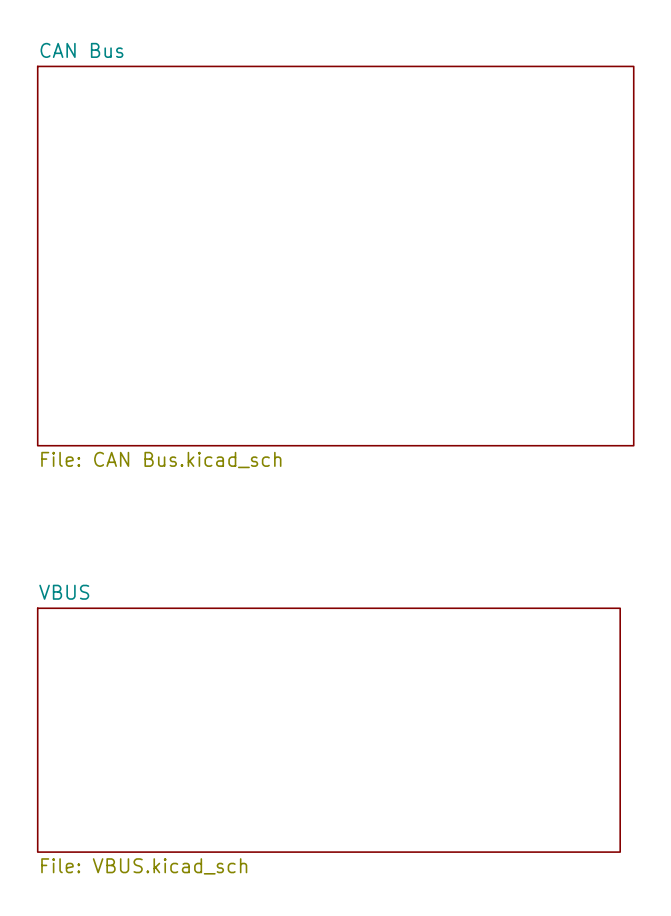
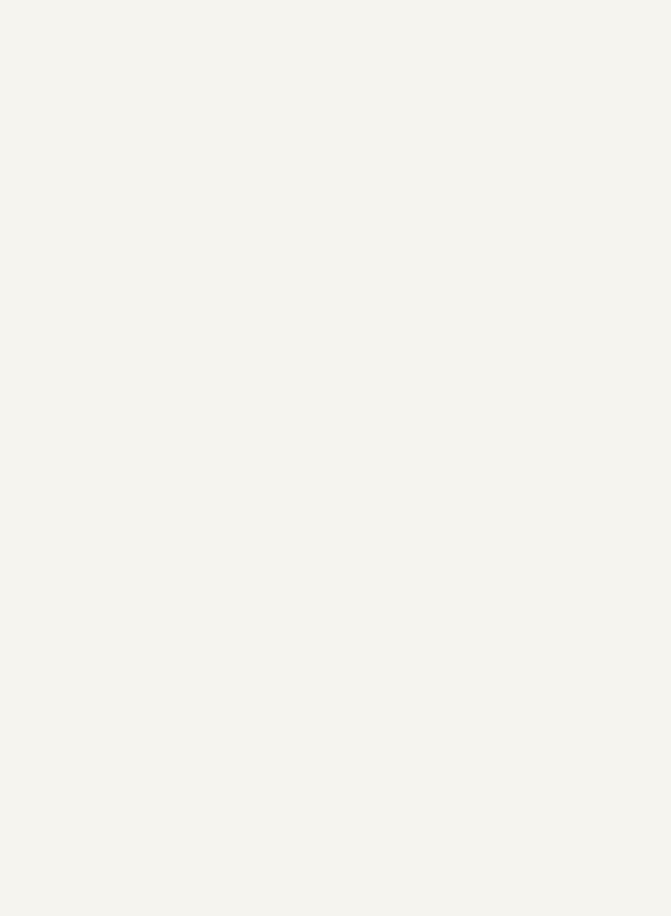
sheet CAN Bus: File: CAN Bus.kicad_sch (335, 256) -> none
sheet VBUS: File: VBUS.kicad_sch (328, 730) -> none

